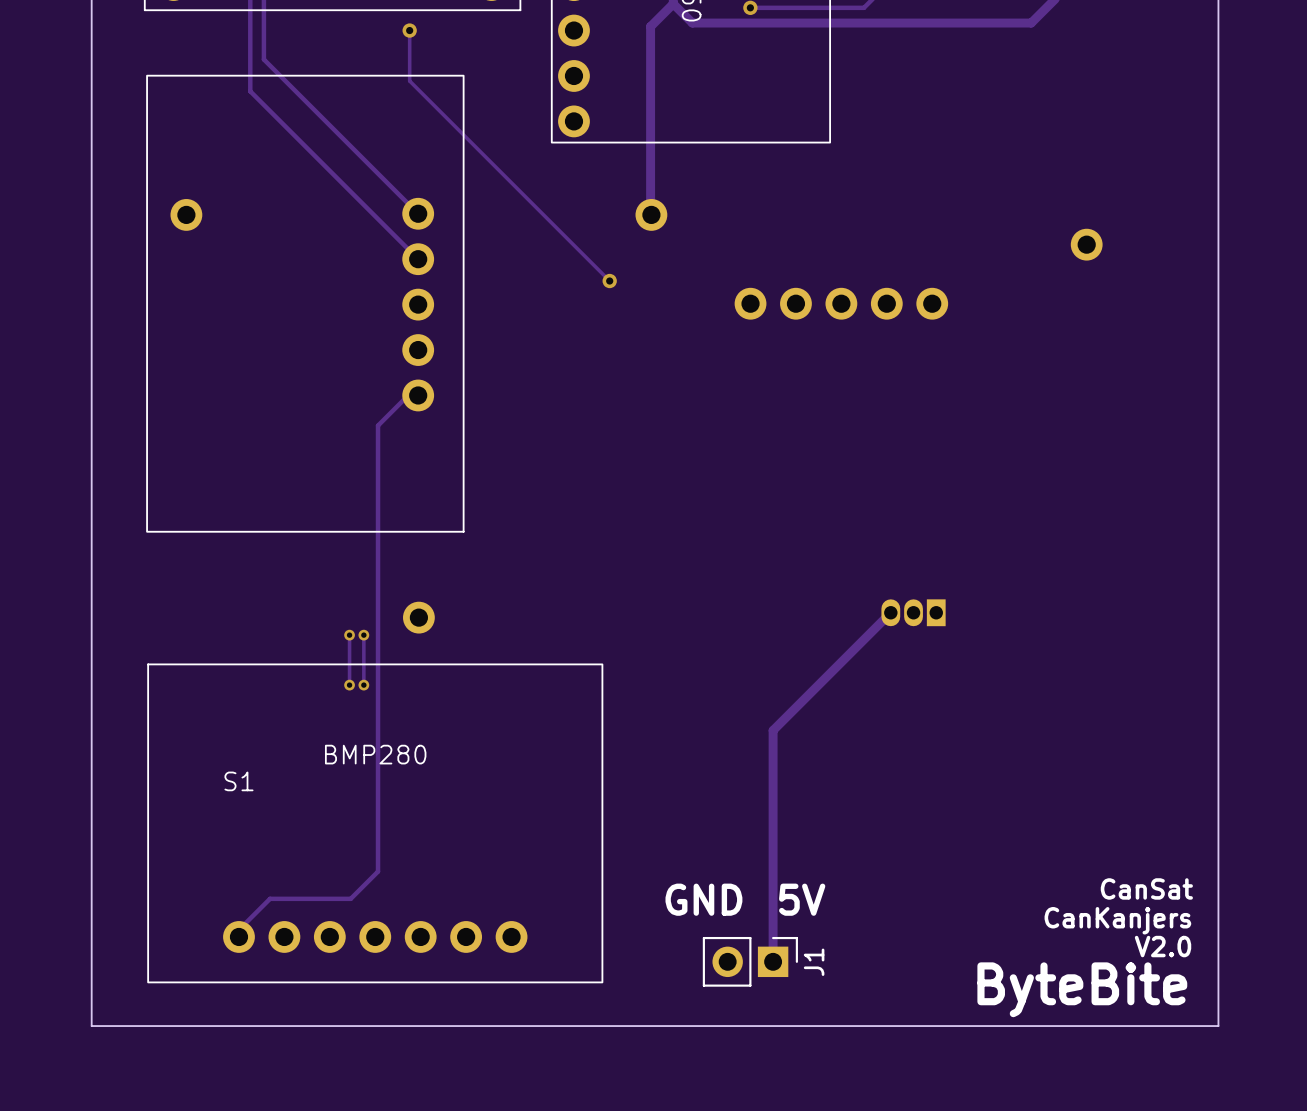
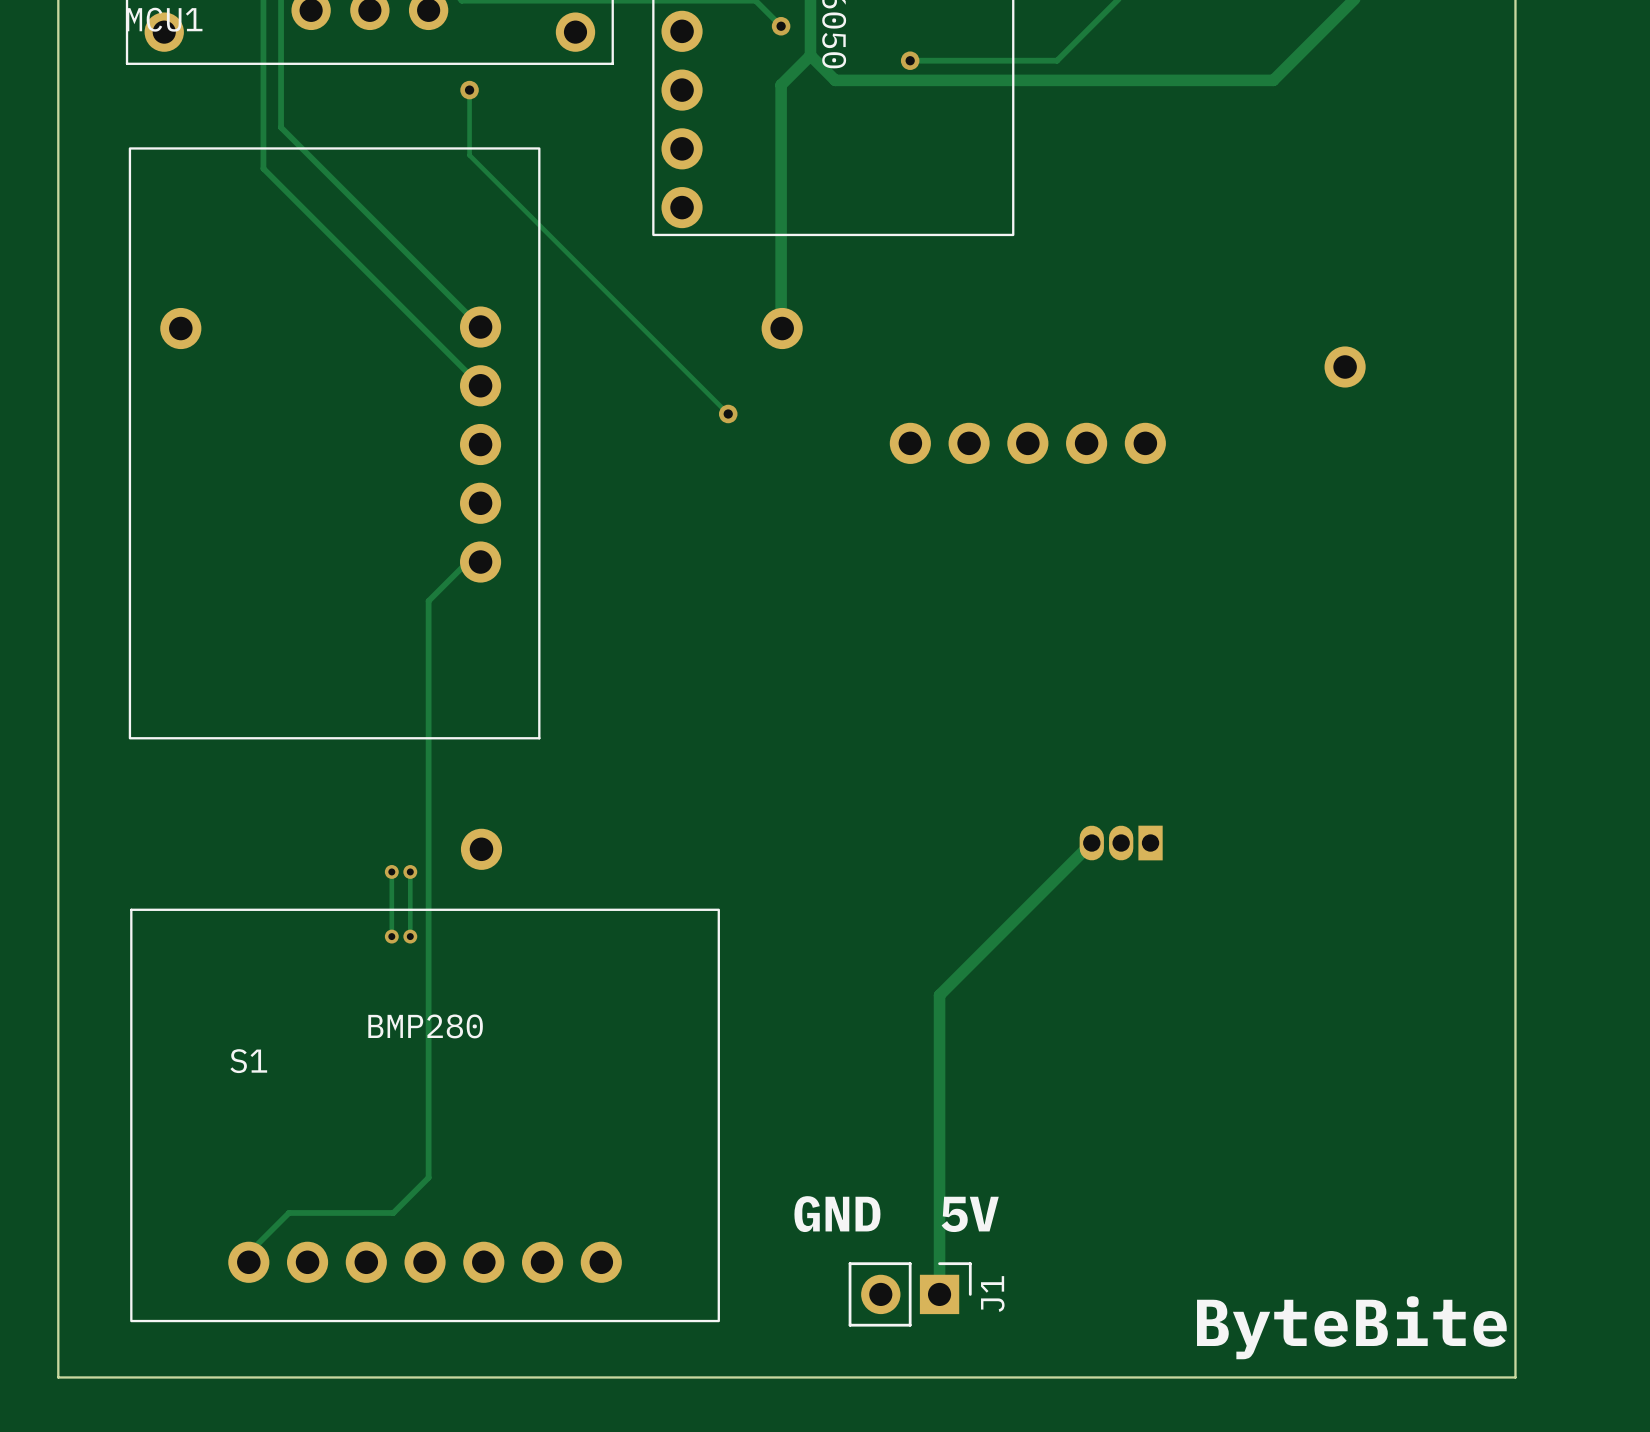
text: CanSat (1146, 888) -> none
text: CanKanjers (1117, 920) -> none
text: V2.0 (1163, 946) -> none
text position: ByteBite (1082, 989) -> ByteBite (1351, 1327)

